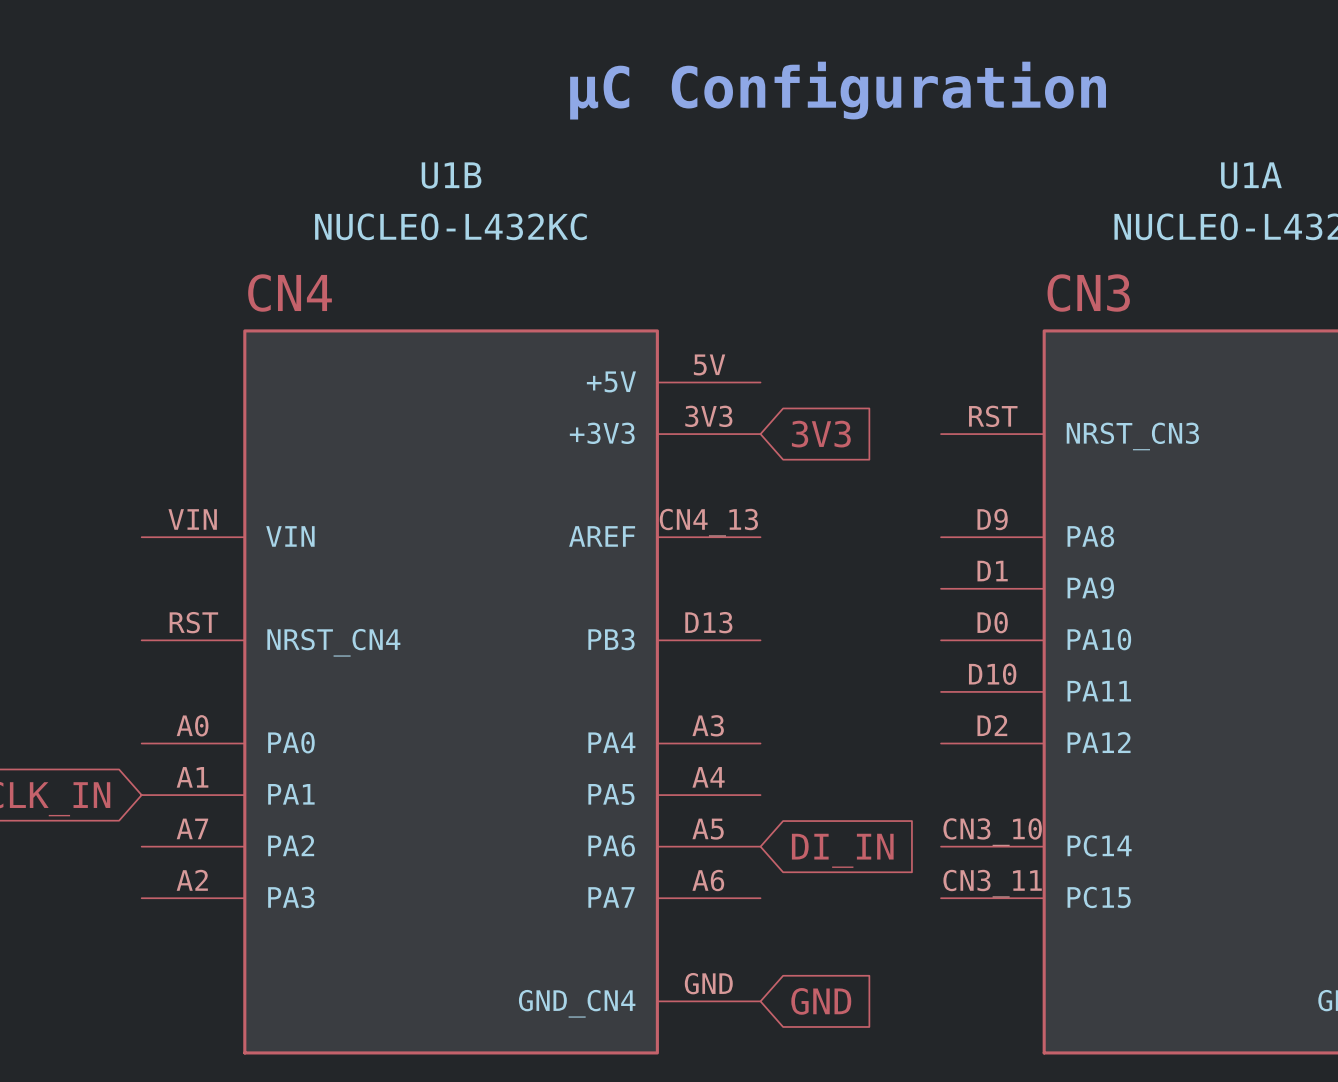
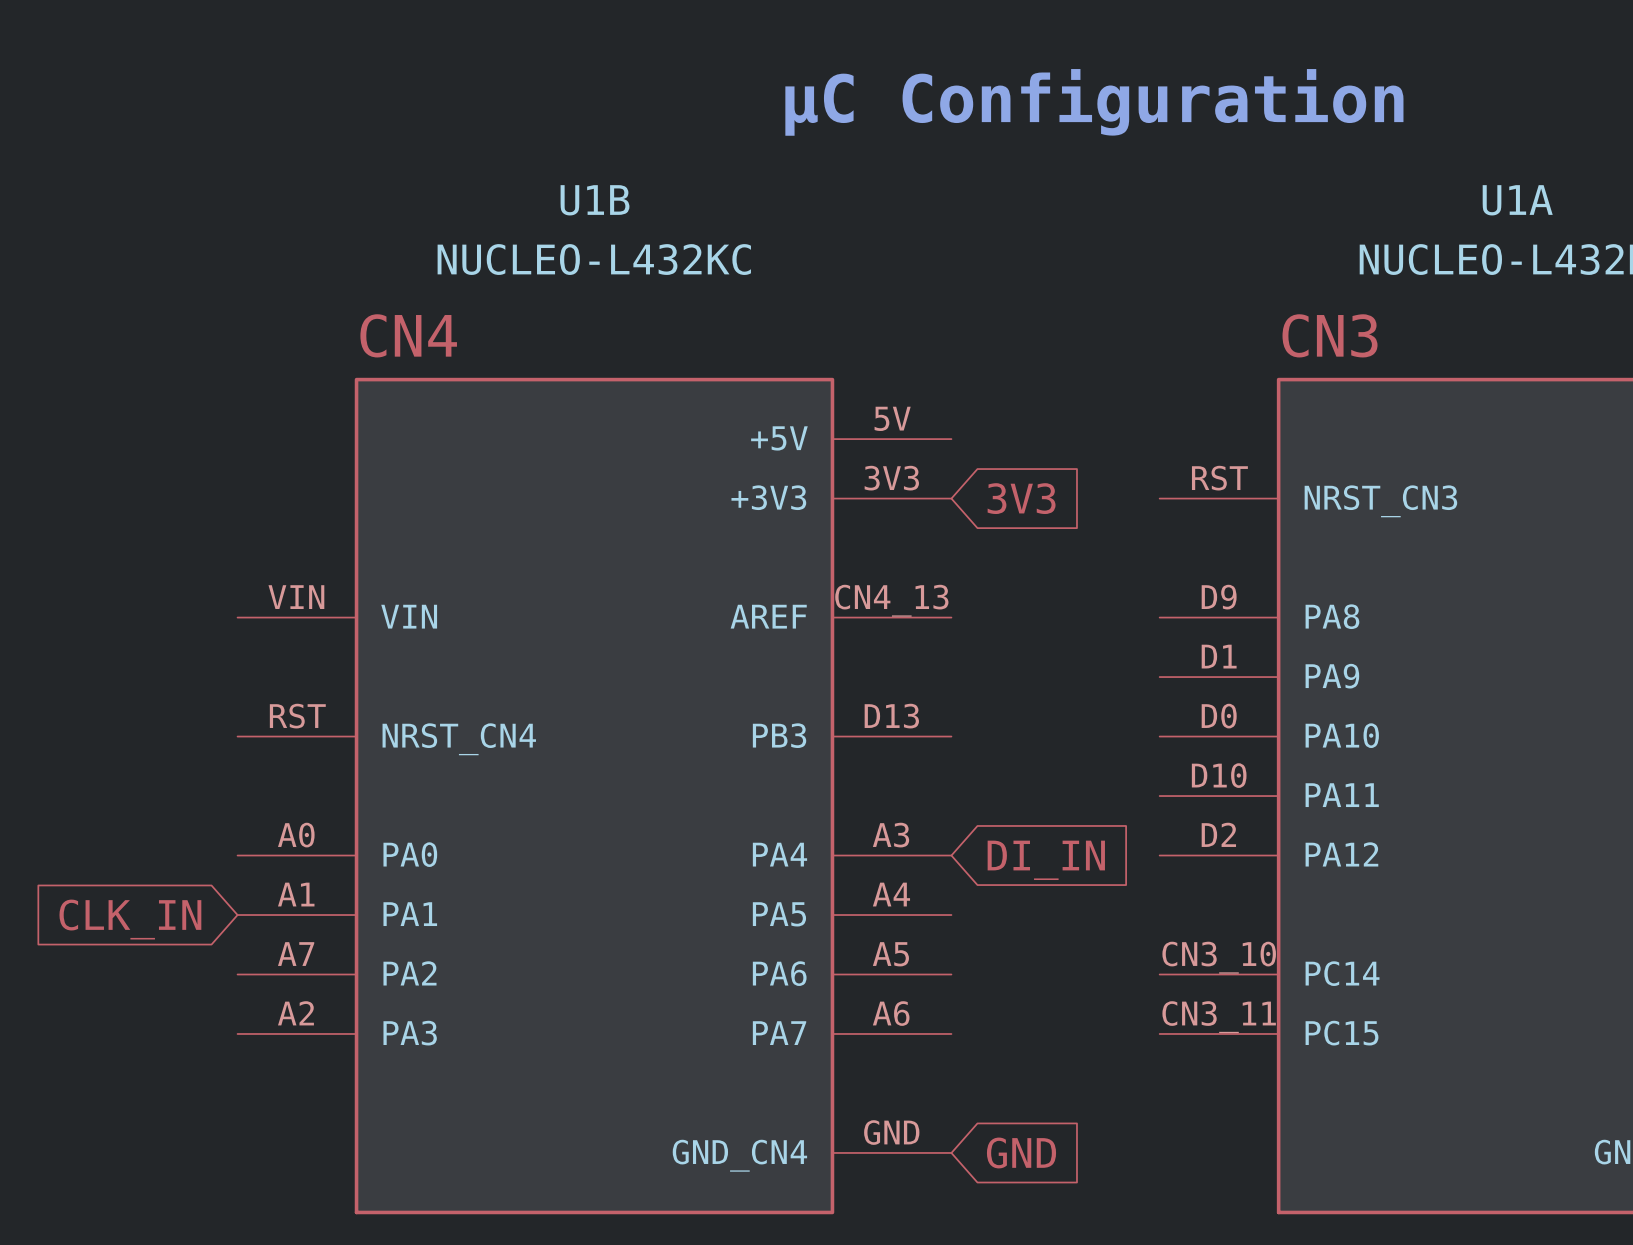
text position: µC Configuration (838, 90) -> µC Configuration (1094, 102)
global label position: DI_IN (842, 850) -> DI_IN (1046, 860)

